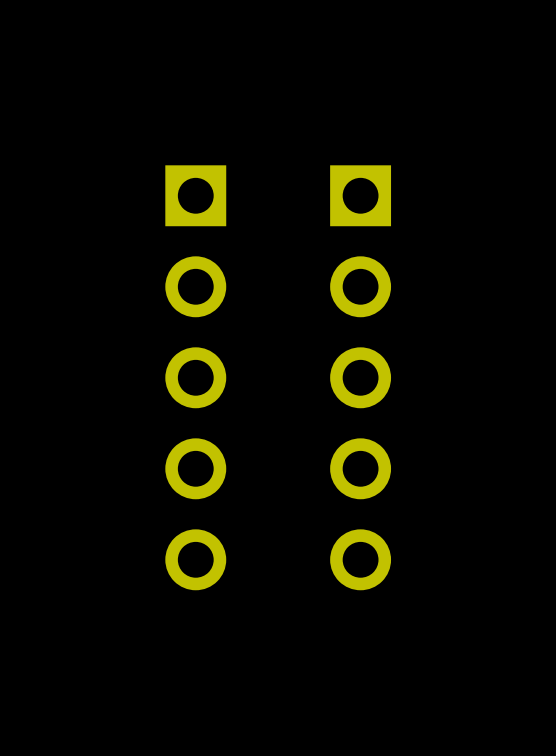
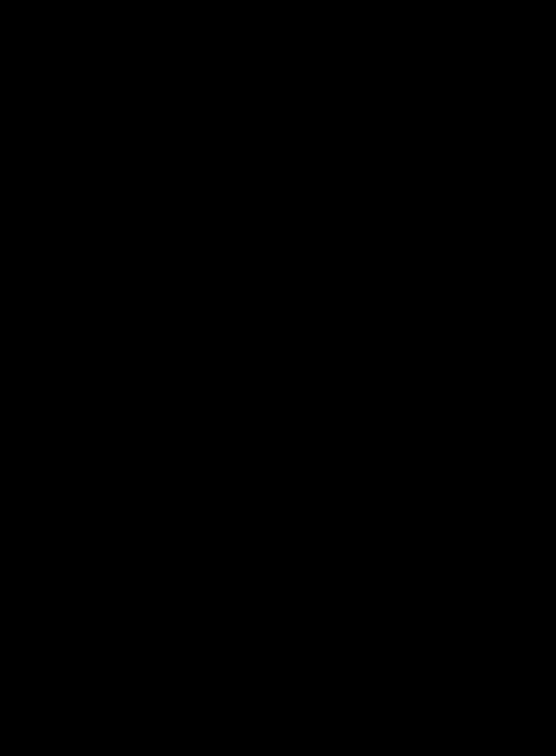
part: (195, 377) -> none
part: (360, 377) -> none

